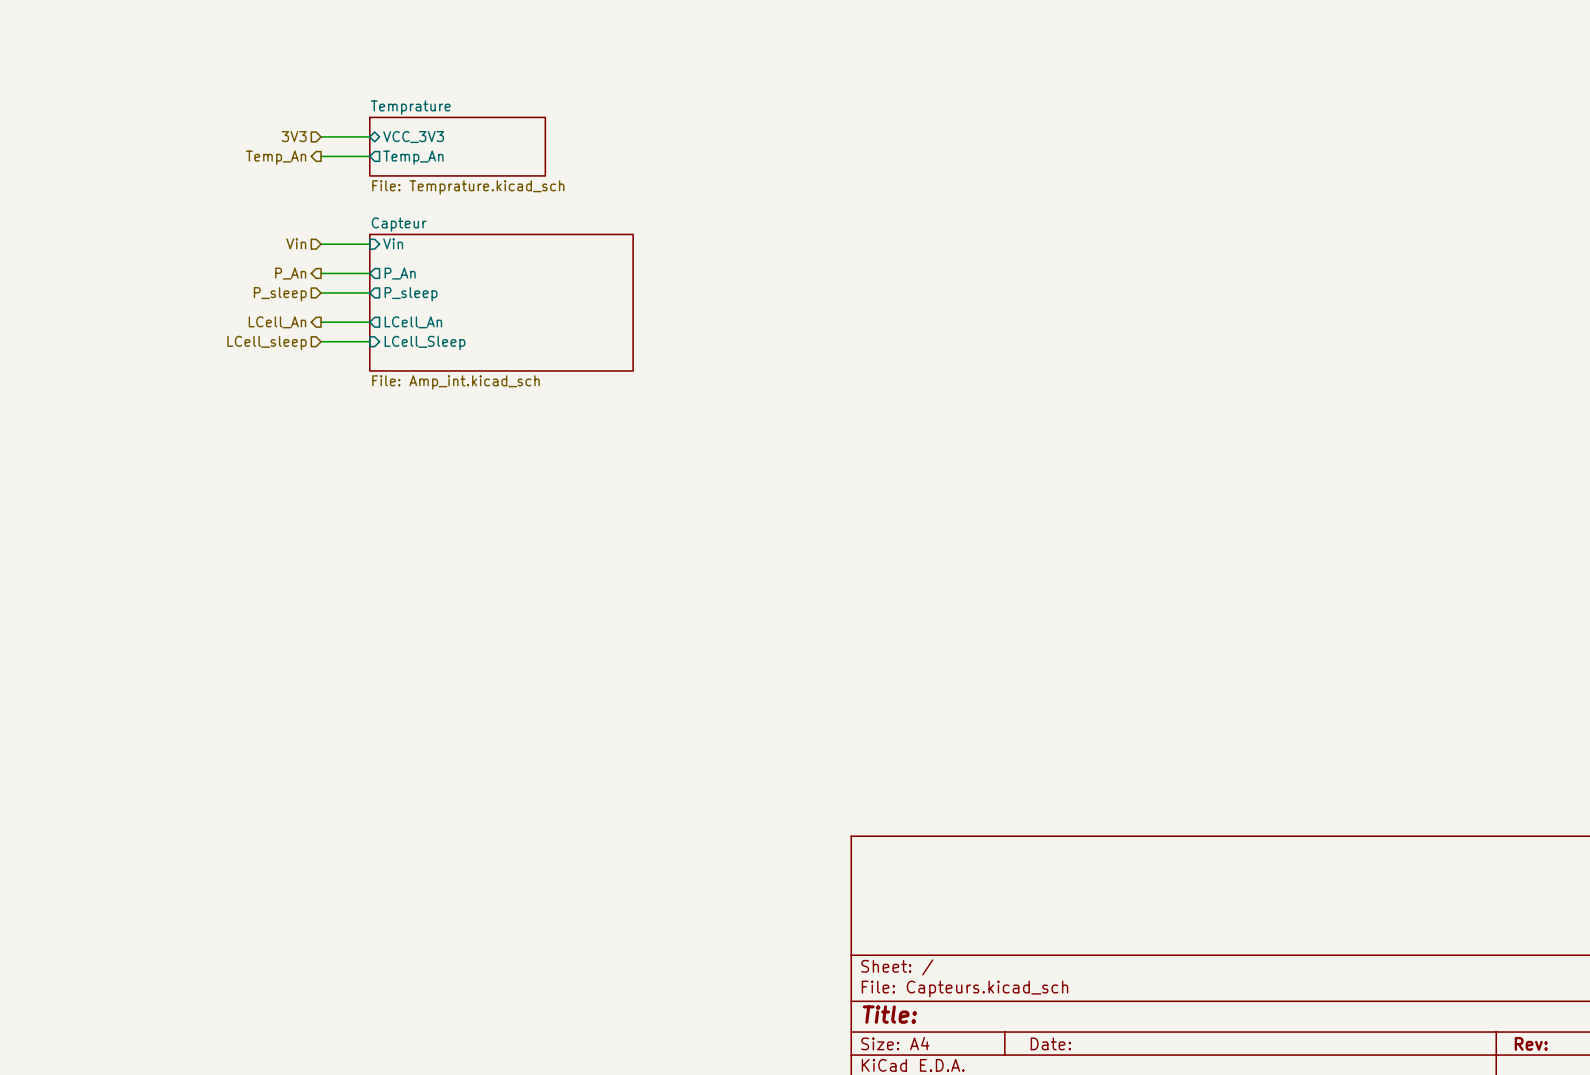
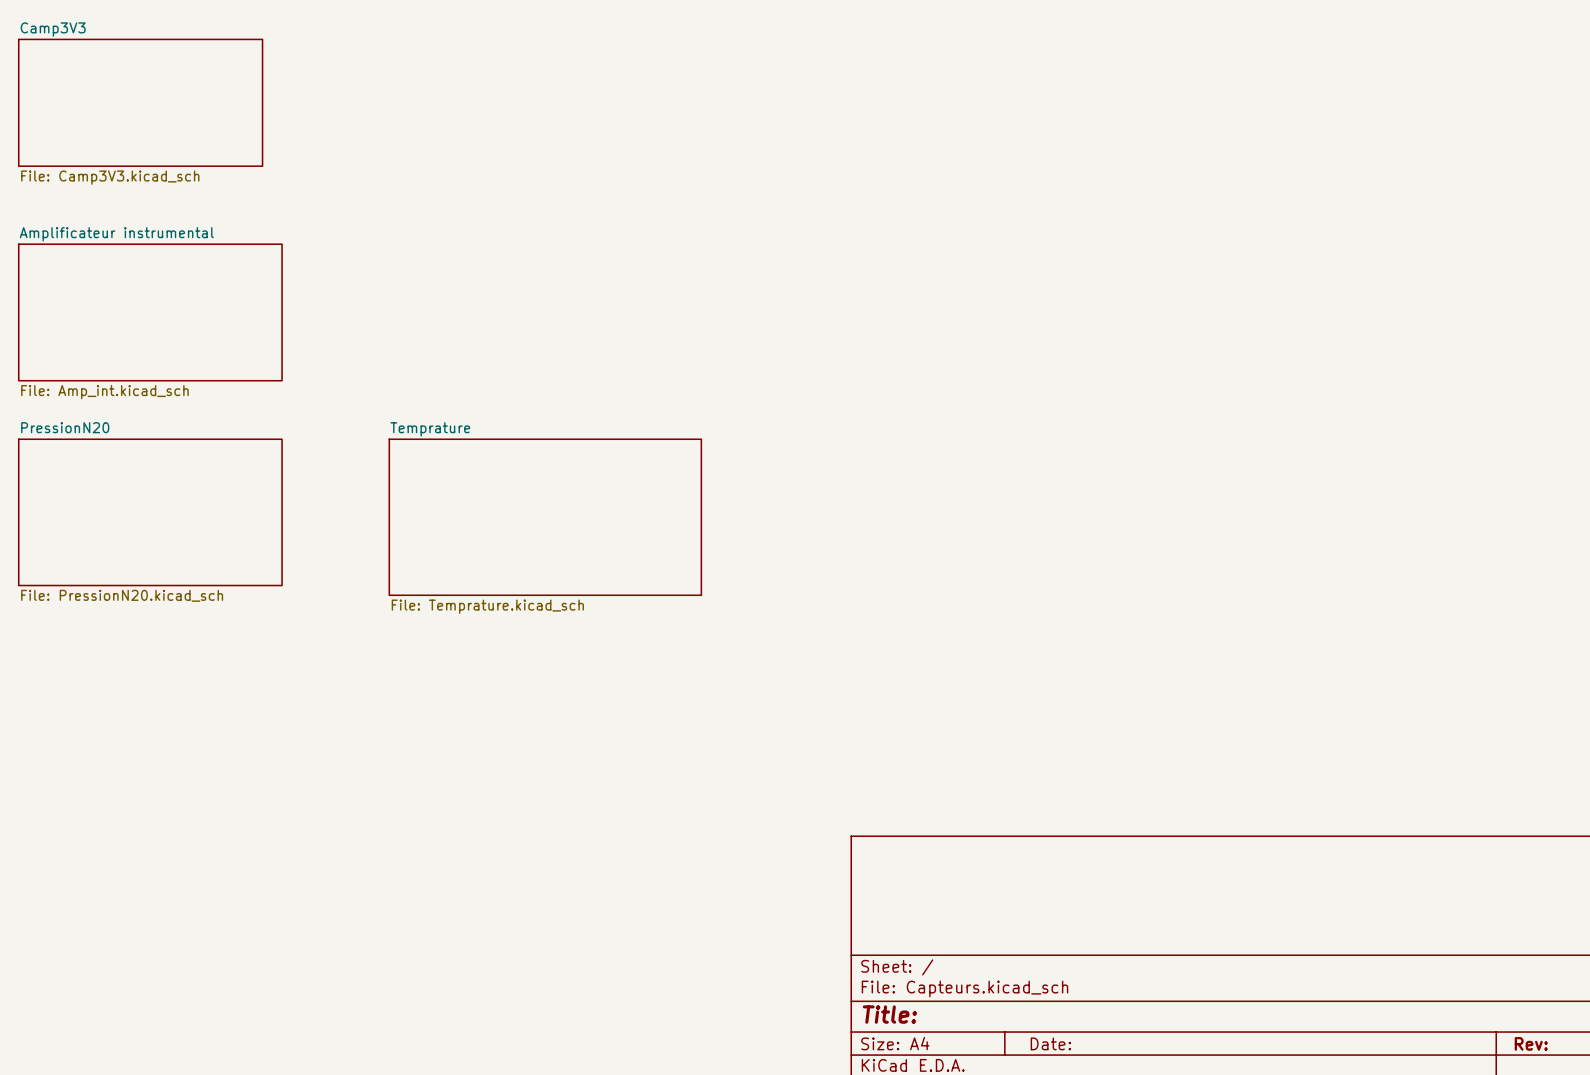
sheet Camp3V3: none -> File: Camp3V3.kicad_sch (140, 102)
hierarchical label: 3V3 (294, 136) -> none
wire: (321, 136) (369, 136) -> none
sheet pin: VCC_3V3 (413, 137) -> none
sheet Temprature: File: Temprature.kicad_sch (457, 146) -> none
wire: (321, 156) (369, 156) -> none
hierarchical label: Temp_An (276, 157) -> none
sheet pin: Temp_An (413, 157) -> none
hierarchical label: Vin (296, 243) -> none
sheet pin: Vin (393, 243) -> none
wire: (321, 244) (369, 244) -> none
hierarchical label: P_An (290, 273) -> none
wire: (321, 273) (369, 273) -> none
sheet pin: P_An (400, 273) -> none
wire: (321, 292) (369, 292) -> none
hierarchical label: P_sleep (280, 294) -> none
sheet pin: P_sleep (411, 294) -> none
sheet Capteur: File: Amp_int.kicad_sch (501, 302) -> none
sheet Amplificateur instrumental: none -> File: Amp_int.kicad_sch (150, 312)
hierarchical label: LCell_An (277, 322) -> none
wire: (321, 322) (369, 322) -> none
sheet pin: LCell_An (413, 322) -> none
wire: (321, 341) (369, 341) -> none
hierarchical label: LCell_sleep (267, 342) -> none
sheet pin: LCell_Sleep (424, 342) -> none
sheet PressionN20: none -> File: PressionN20.kicad_sch (150, 512)
sheet Temprature: none -> File: Temprature.kicad_sch (545, 517)

